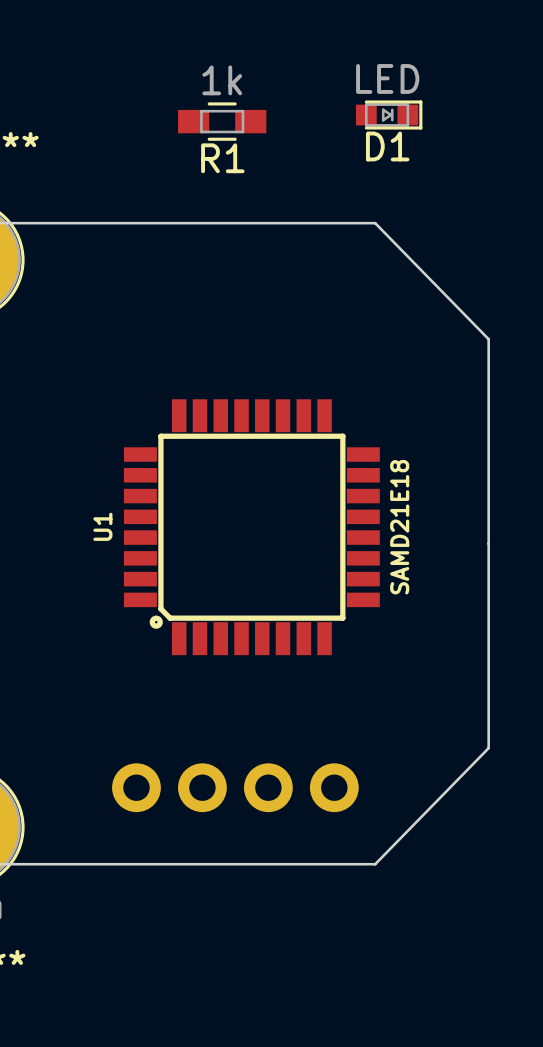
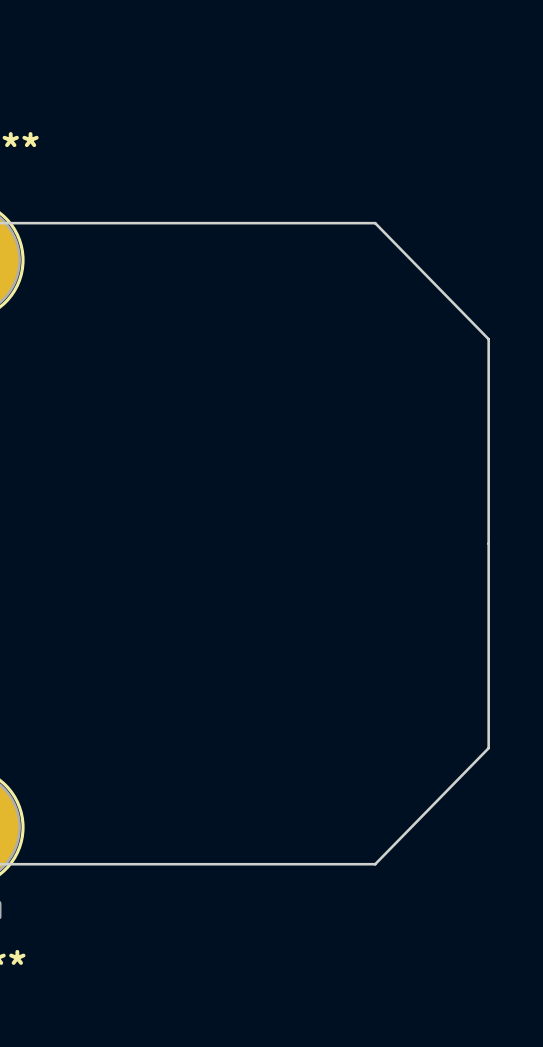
D1: LED (389, 115) -> none
R1: 1k (222, 121) -> none
U1: SAMD21E18 (251, 527) -> none
part: (235, 787) -> none

